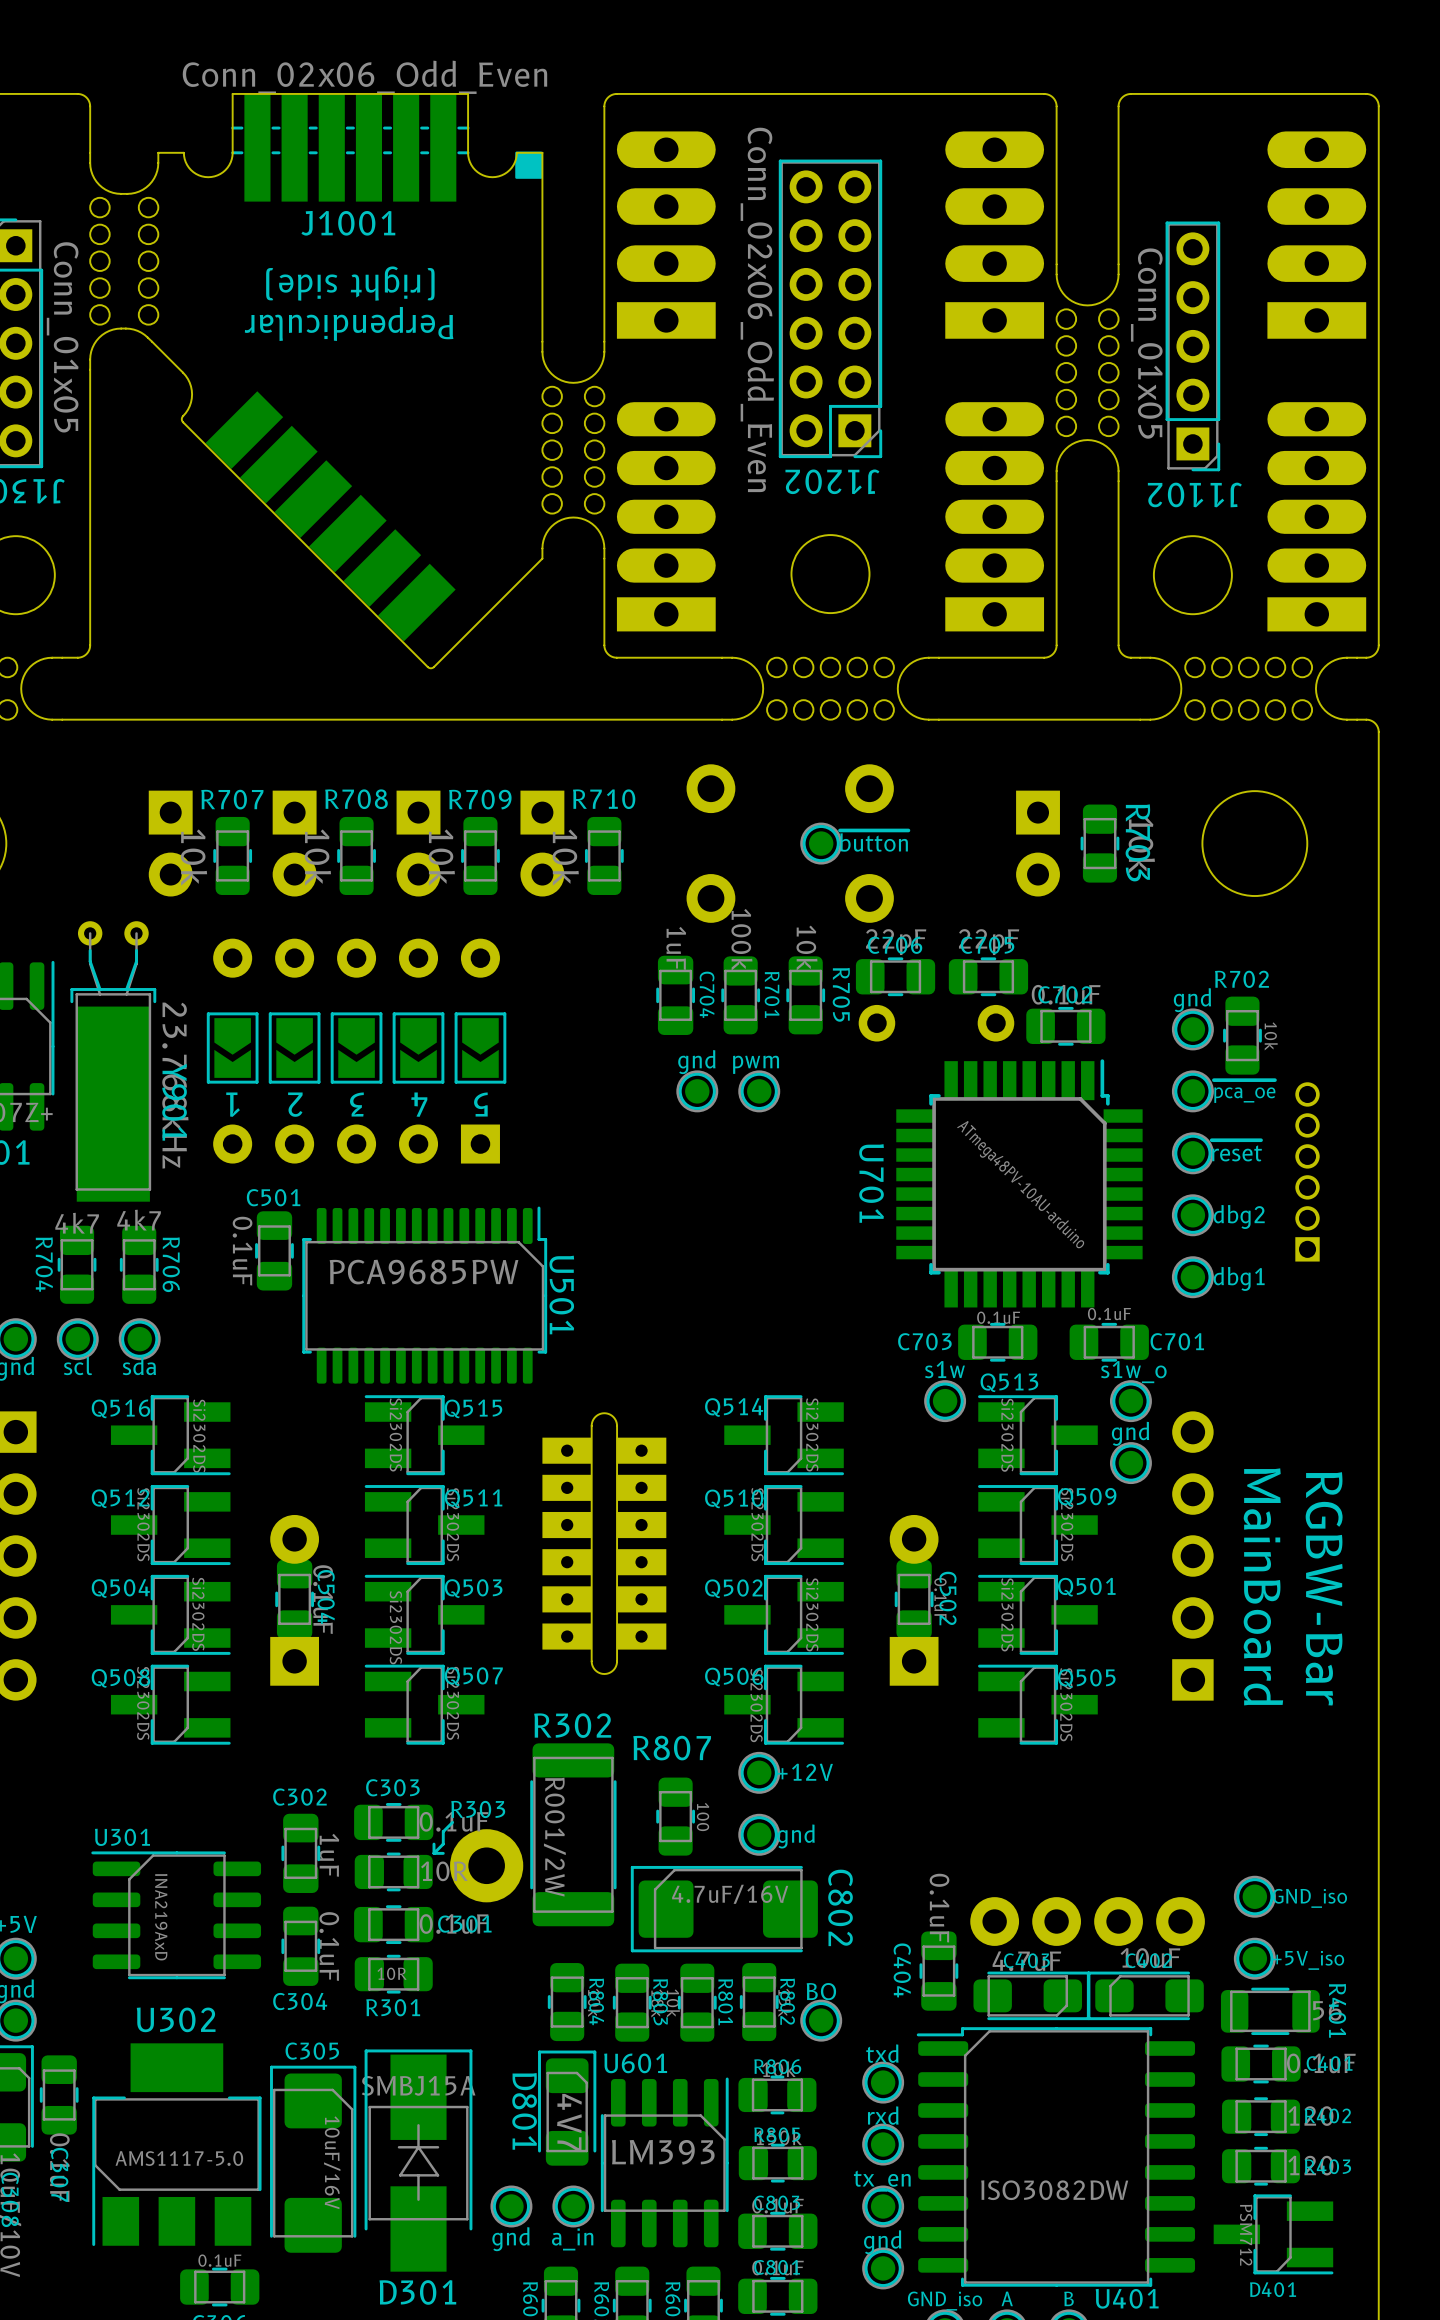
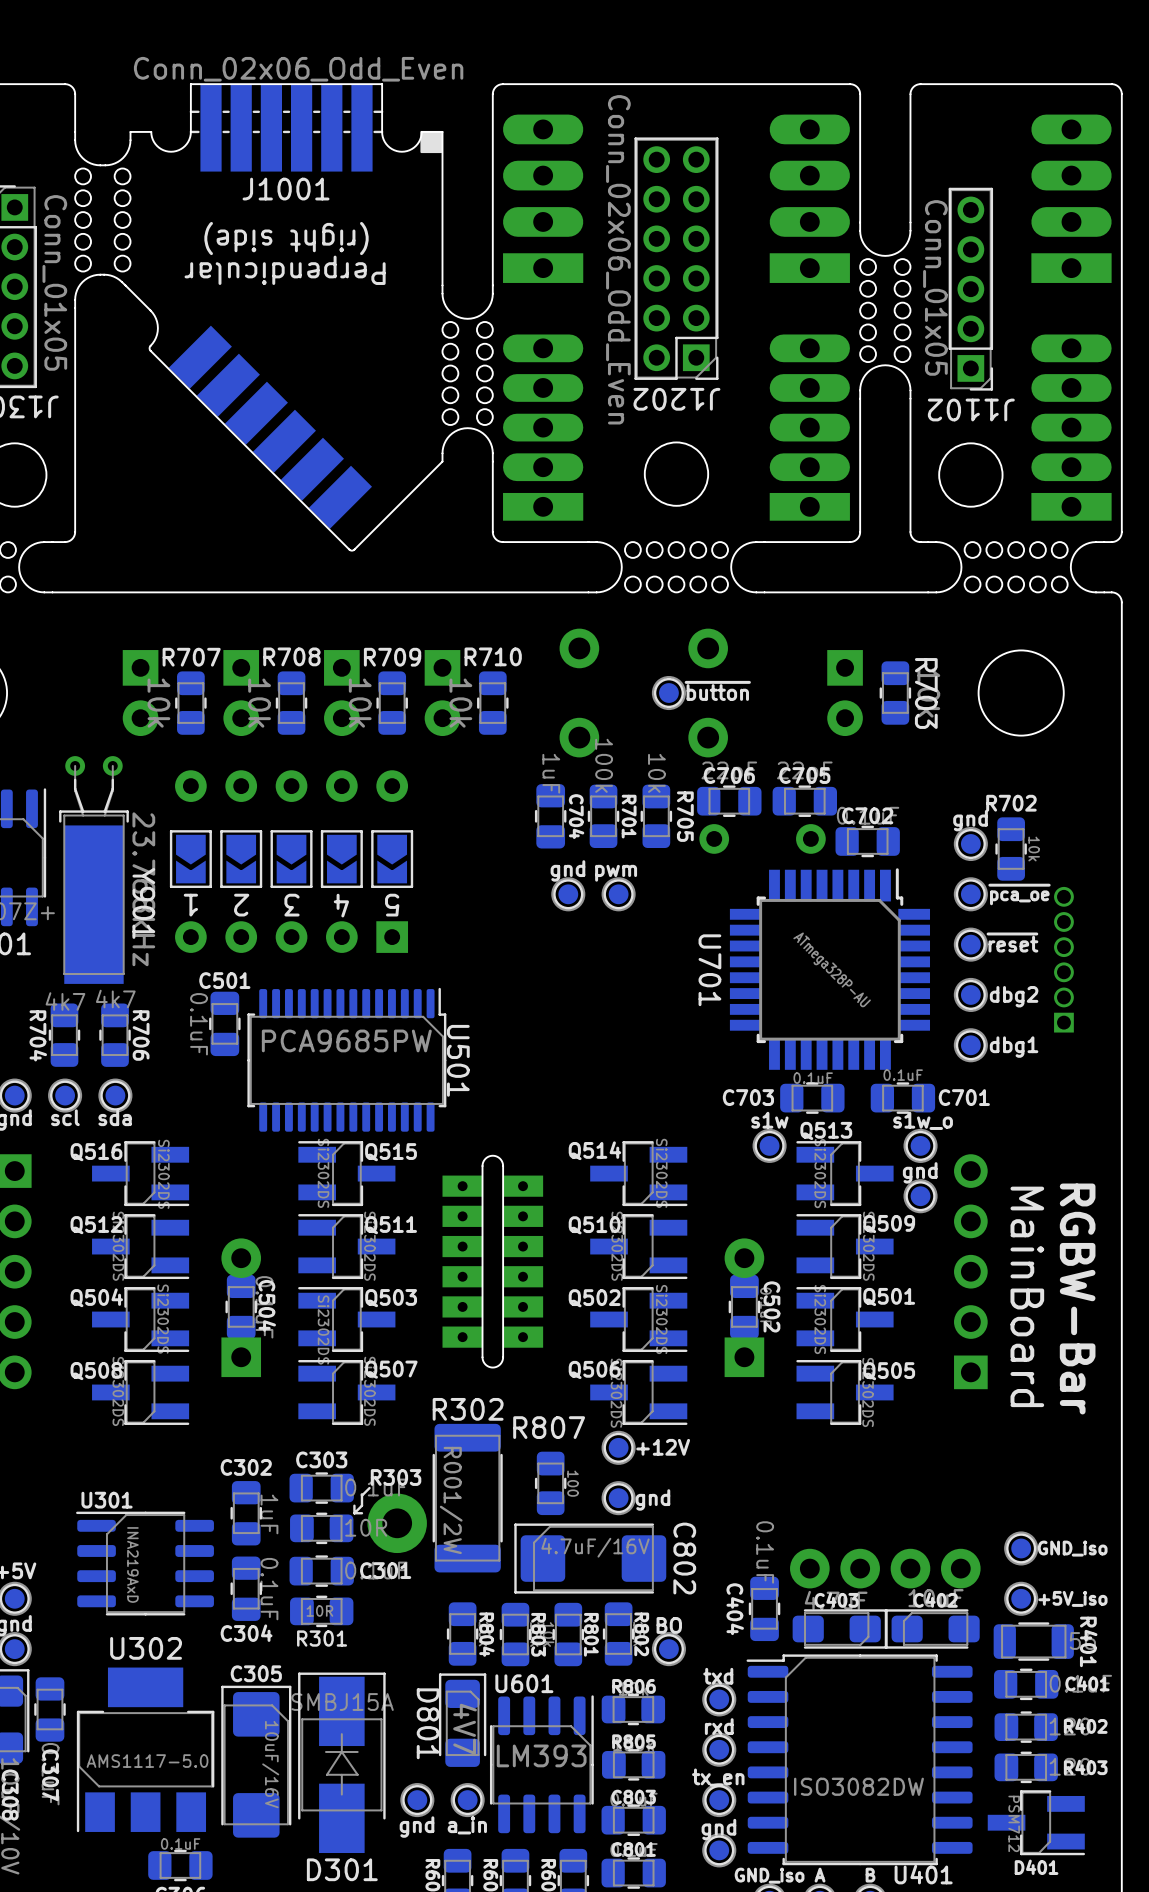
U701 value: ATmega48PV-10AU-arduino (1020, 1184) -> ATmega328P-AU (832, 969)

